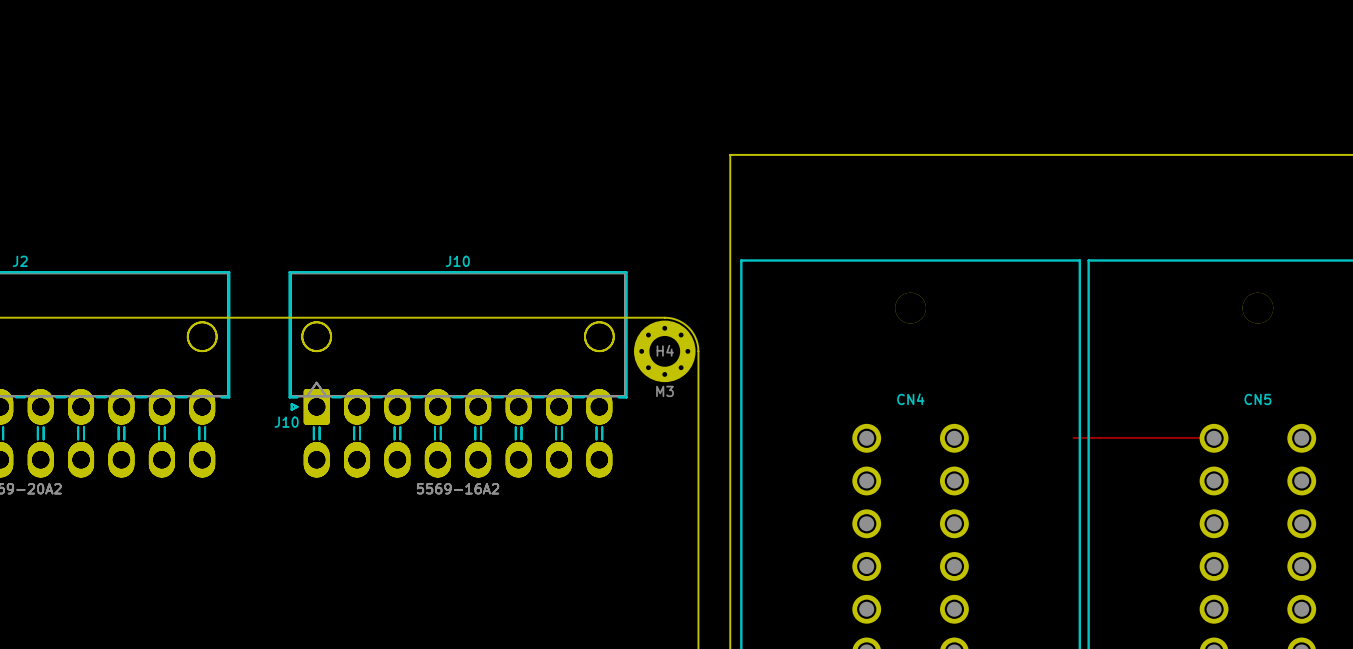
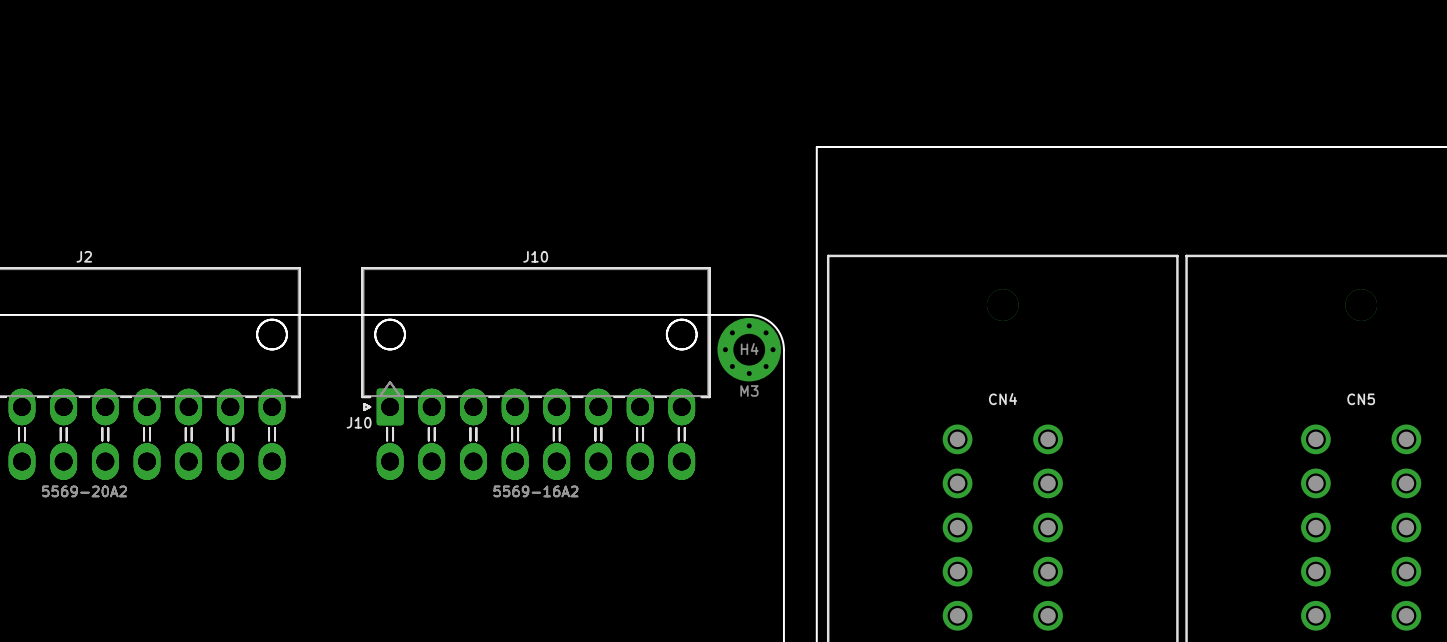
top track: (1073, 437) (1214, 438) -> none

